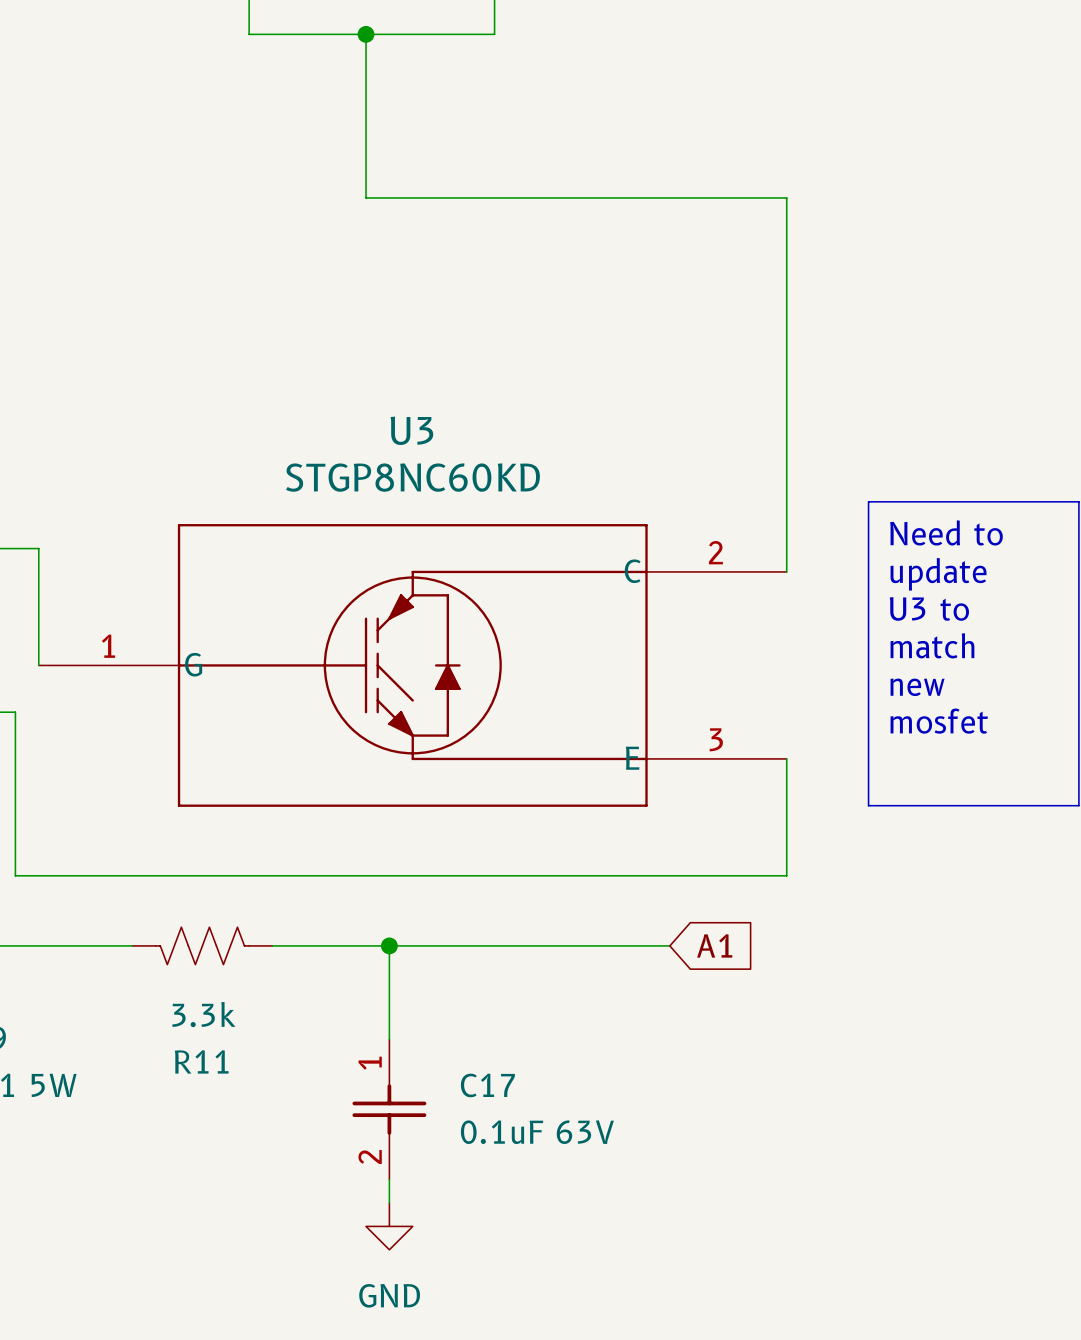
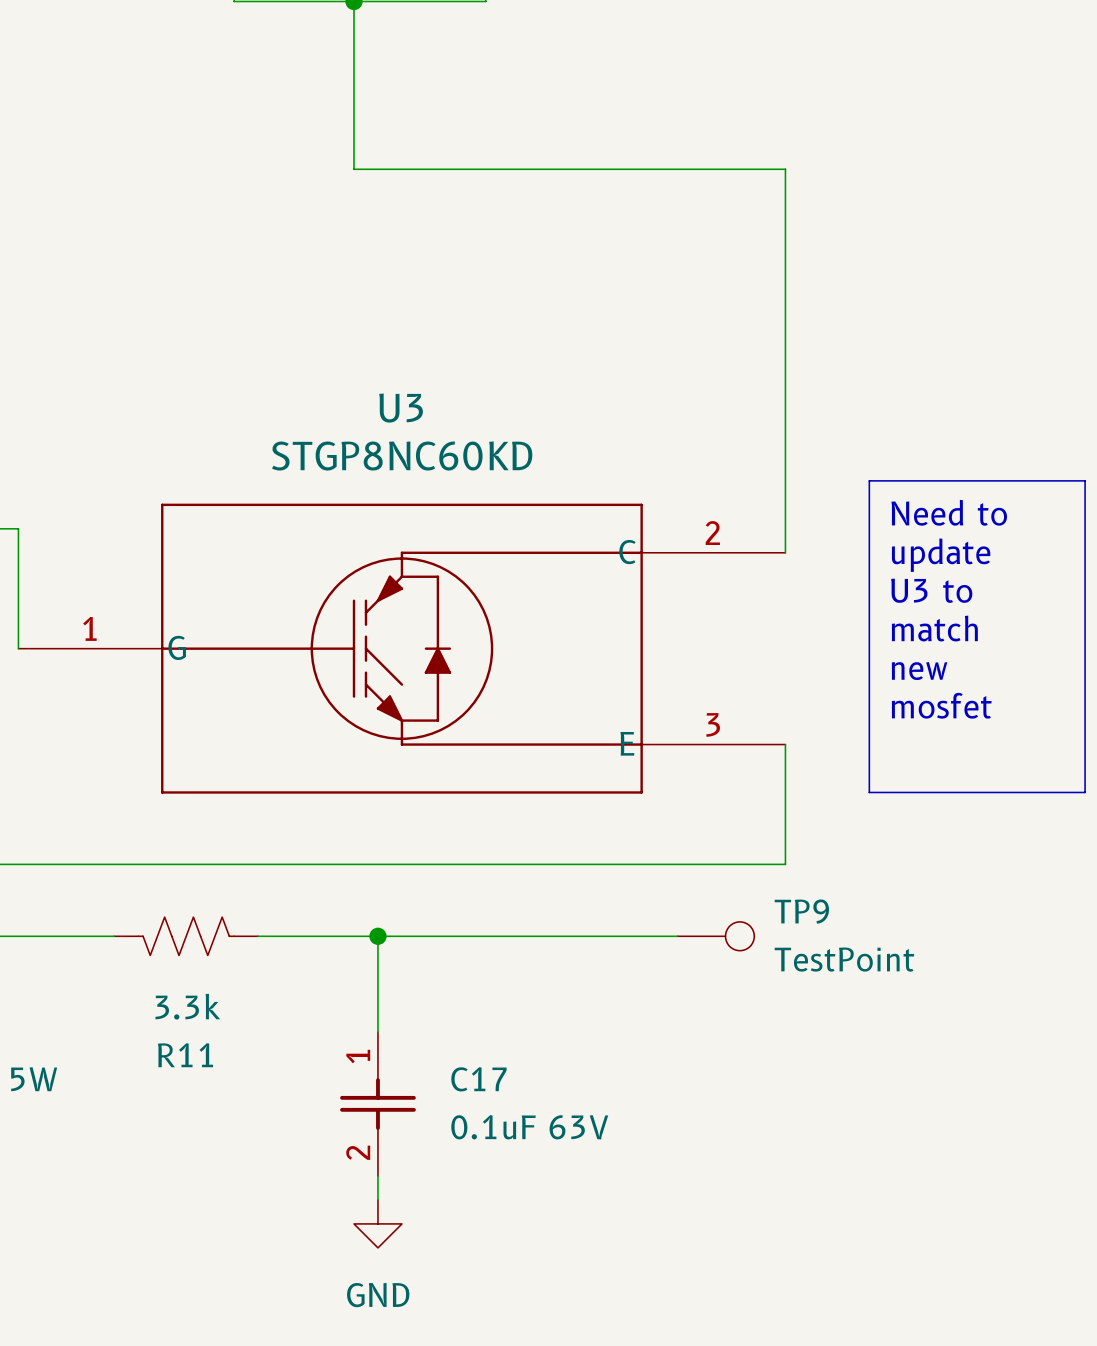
wire: none -> (665, 936) (677, 936)
global label: A1 (714, 945) -> none
TP9: none -> TestPoint (715, 936)

